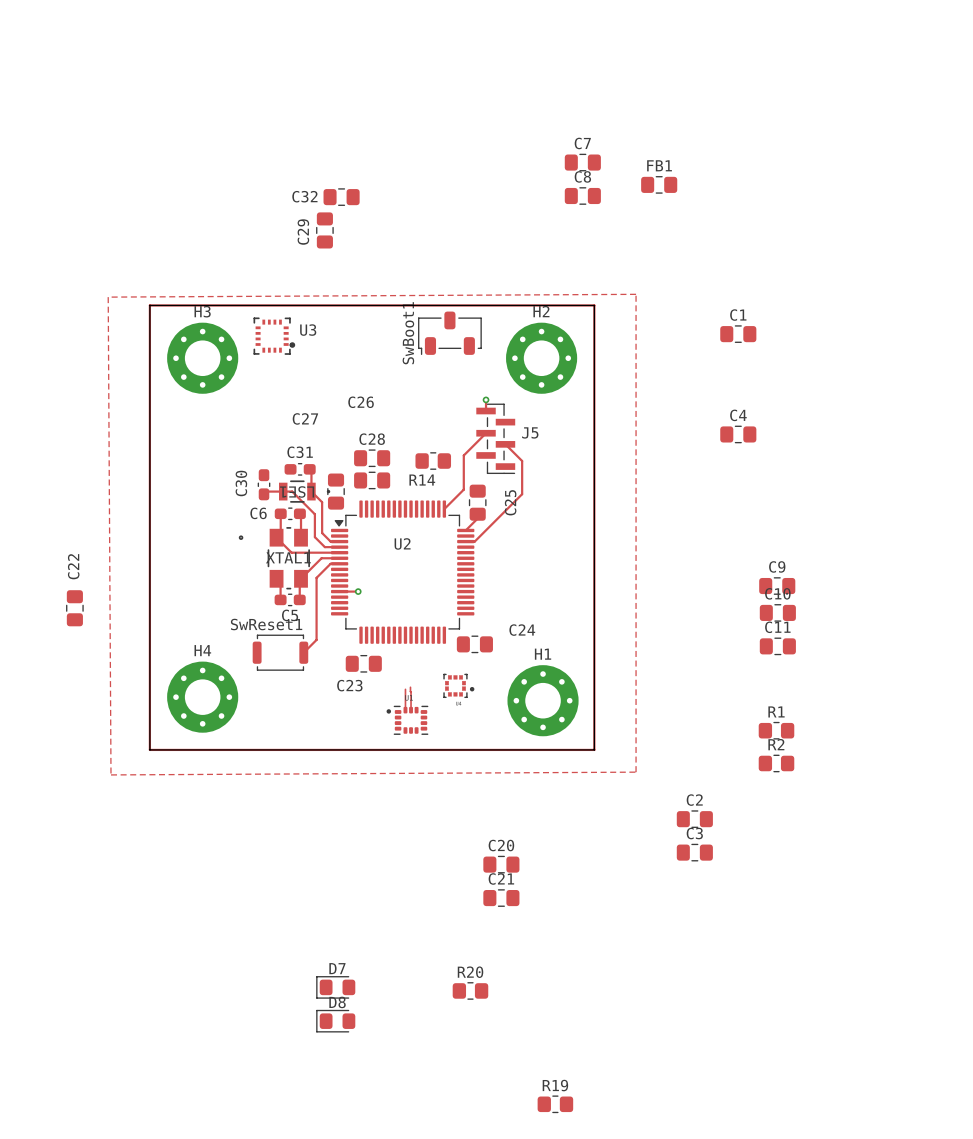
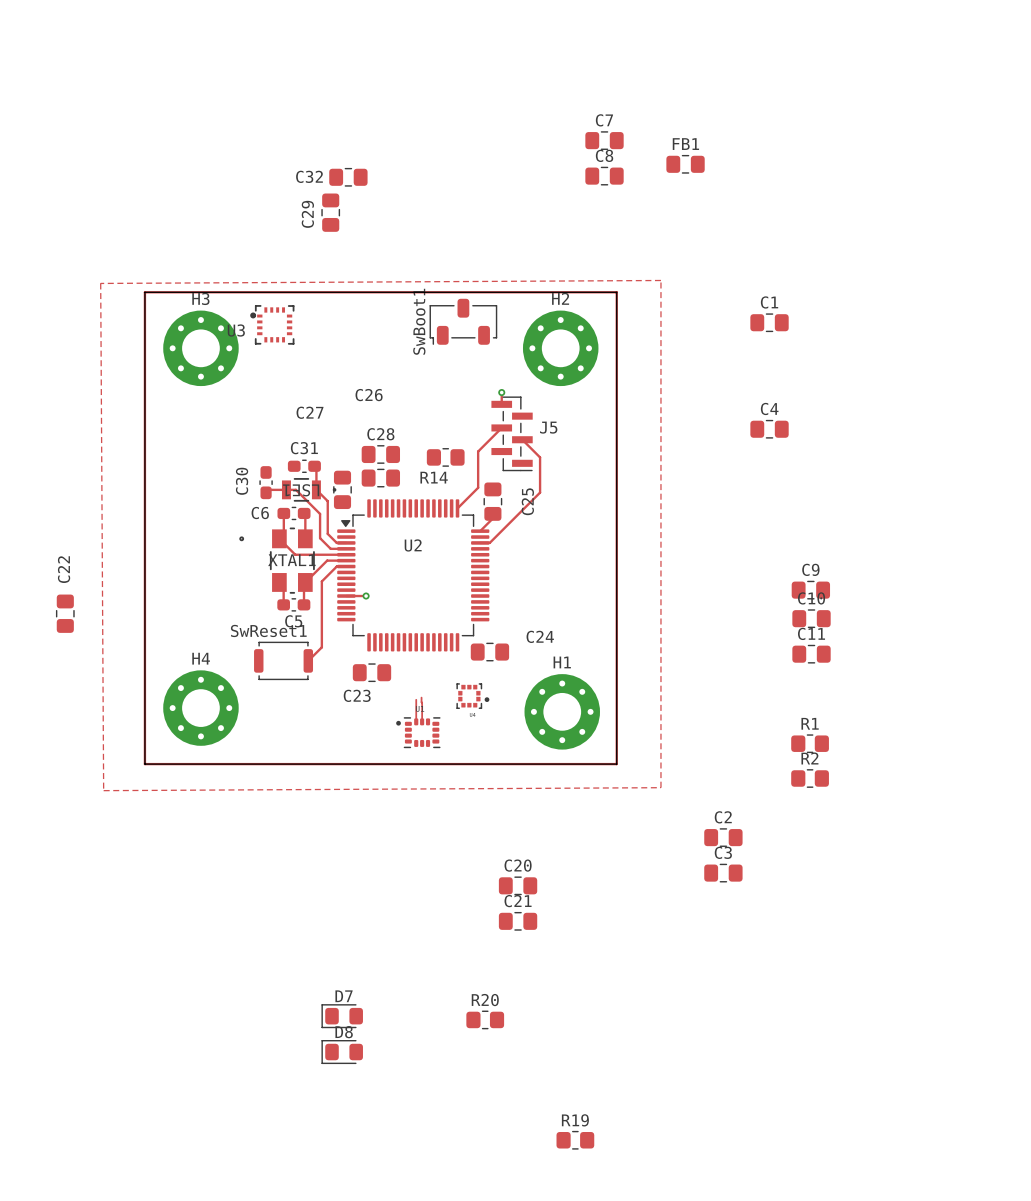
U3 rotation: 0° (274, 336) -> 180° (272, 324)

